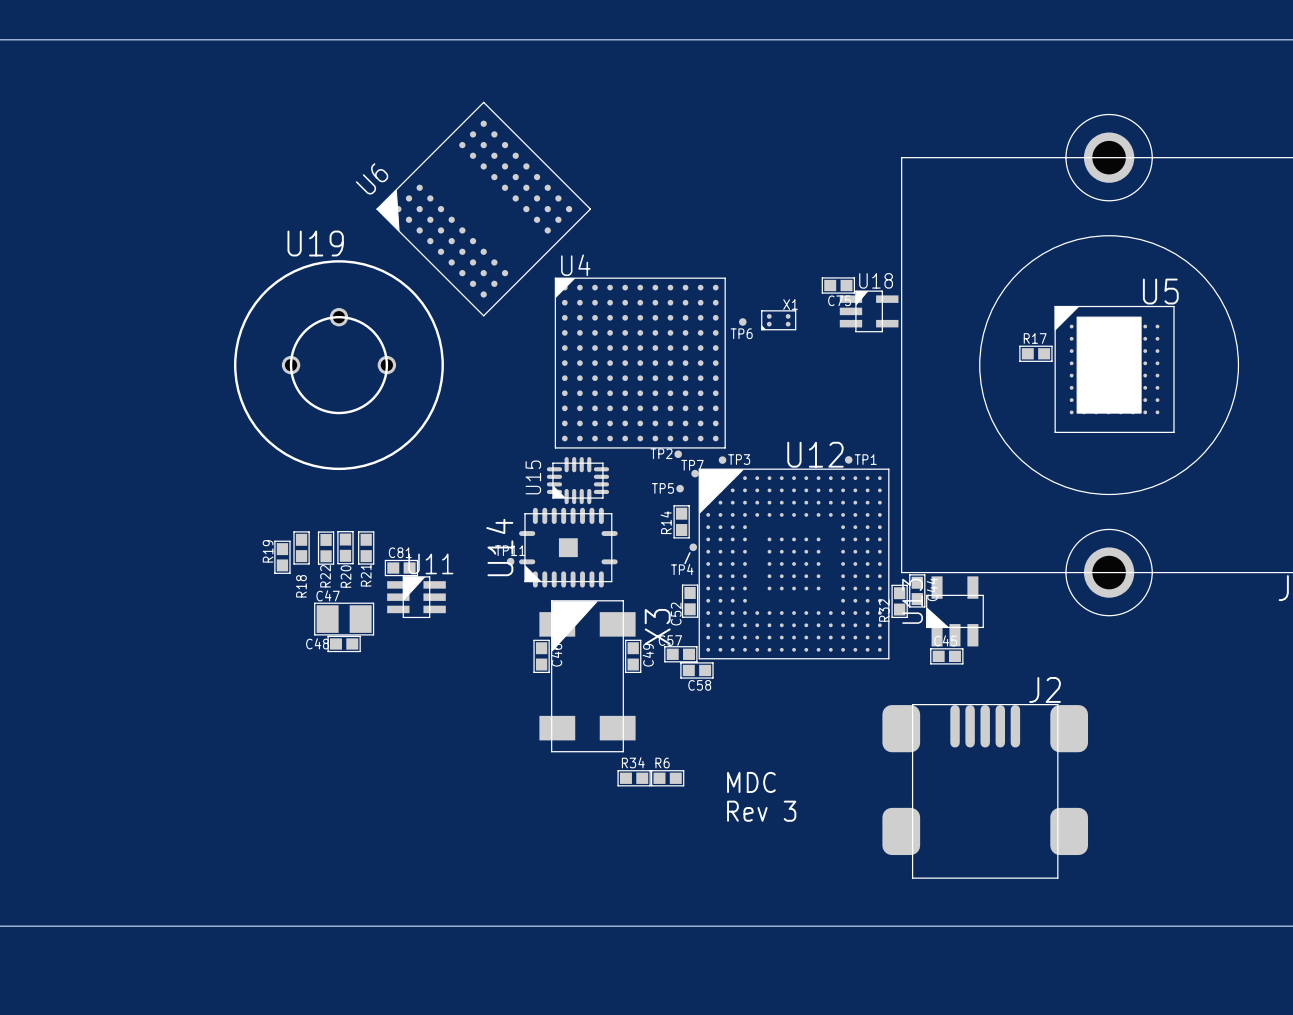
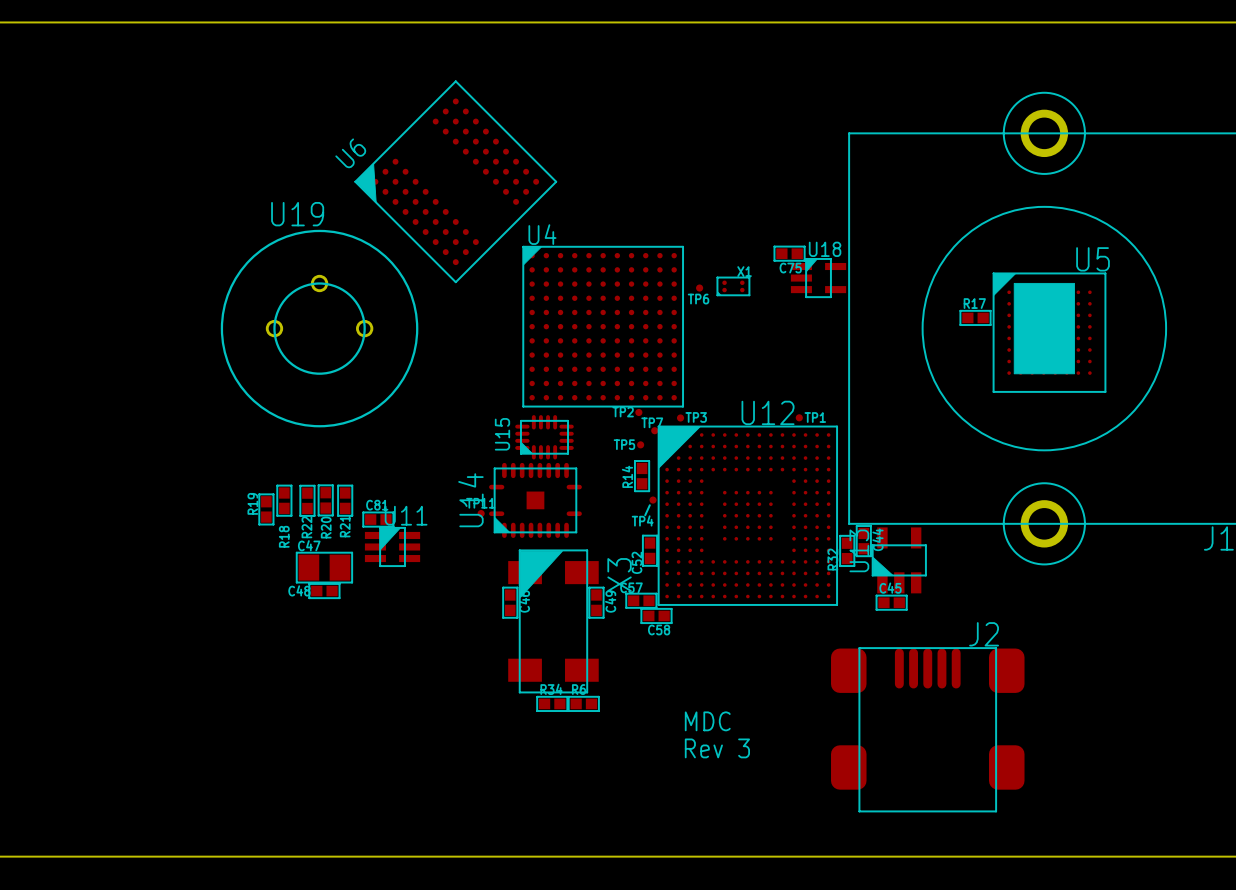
R34 position: (634, 778) -> (552, 703)
R6 position: (667, 778) -> (583, 703)

